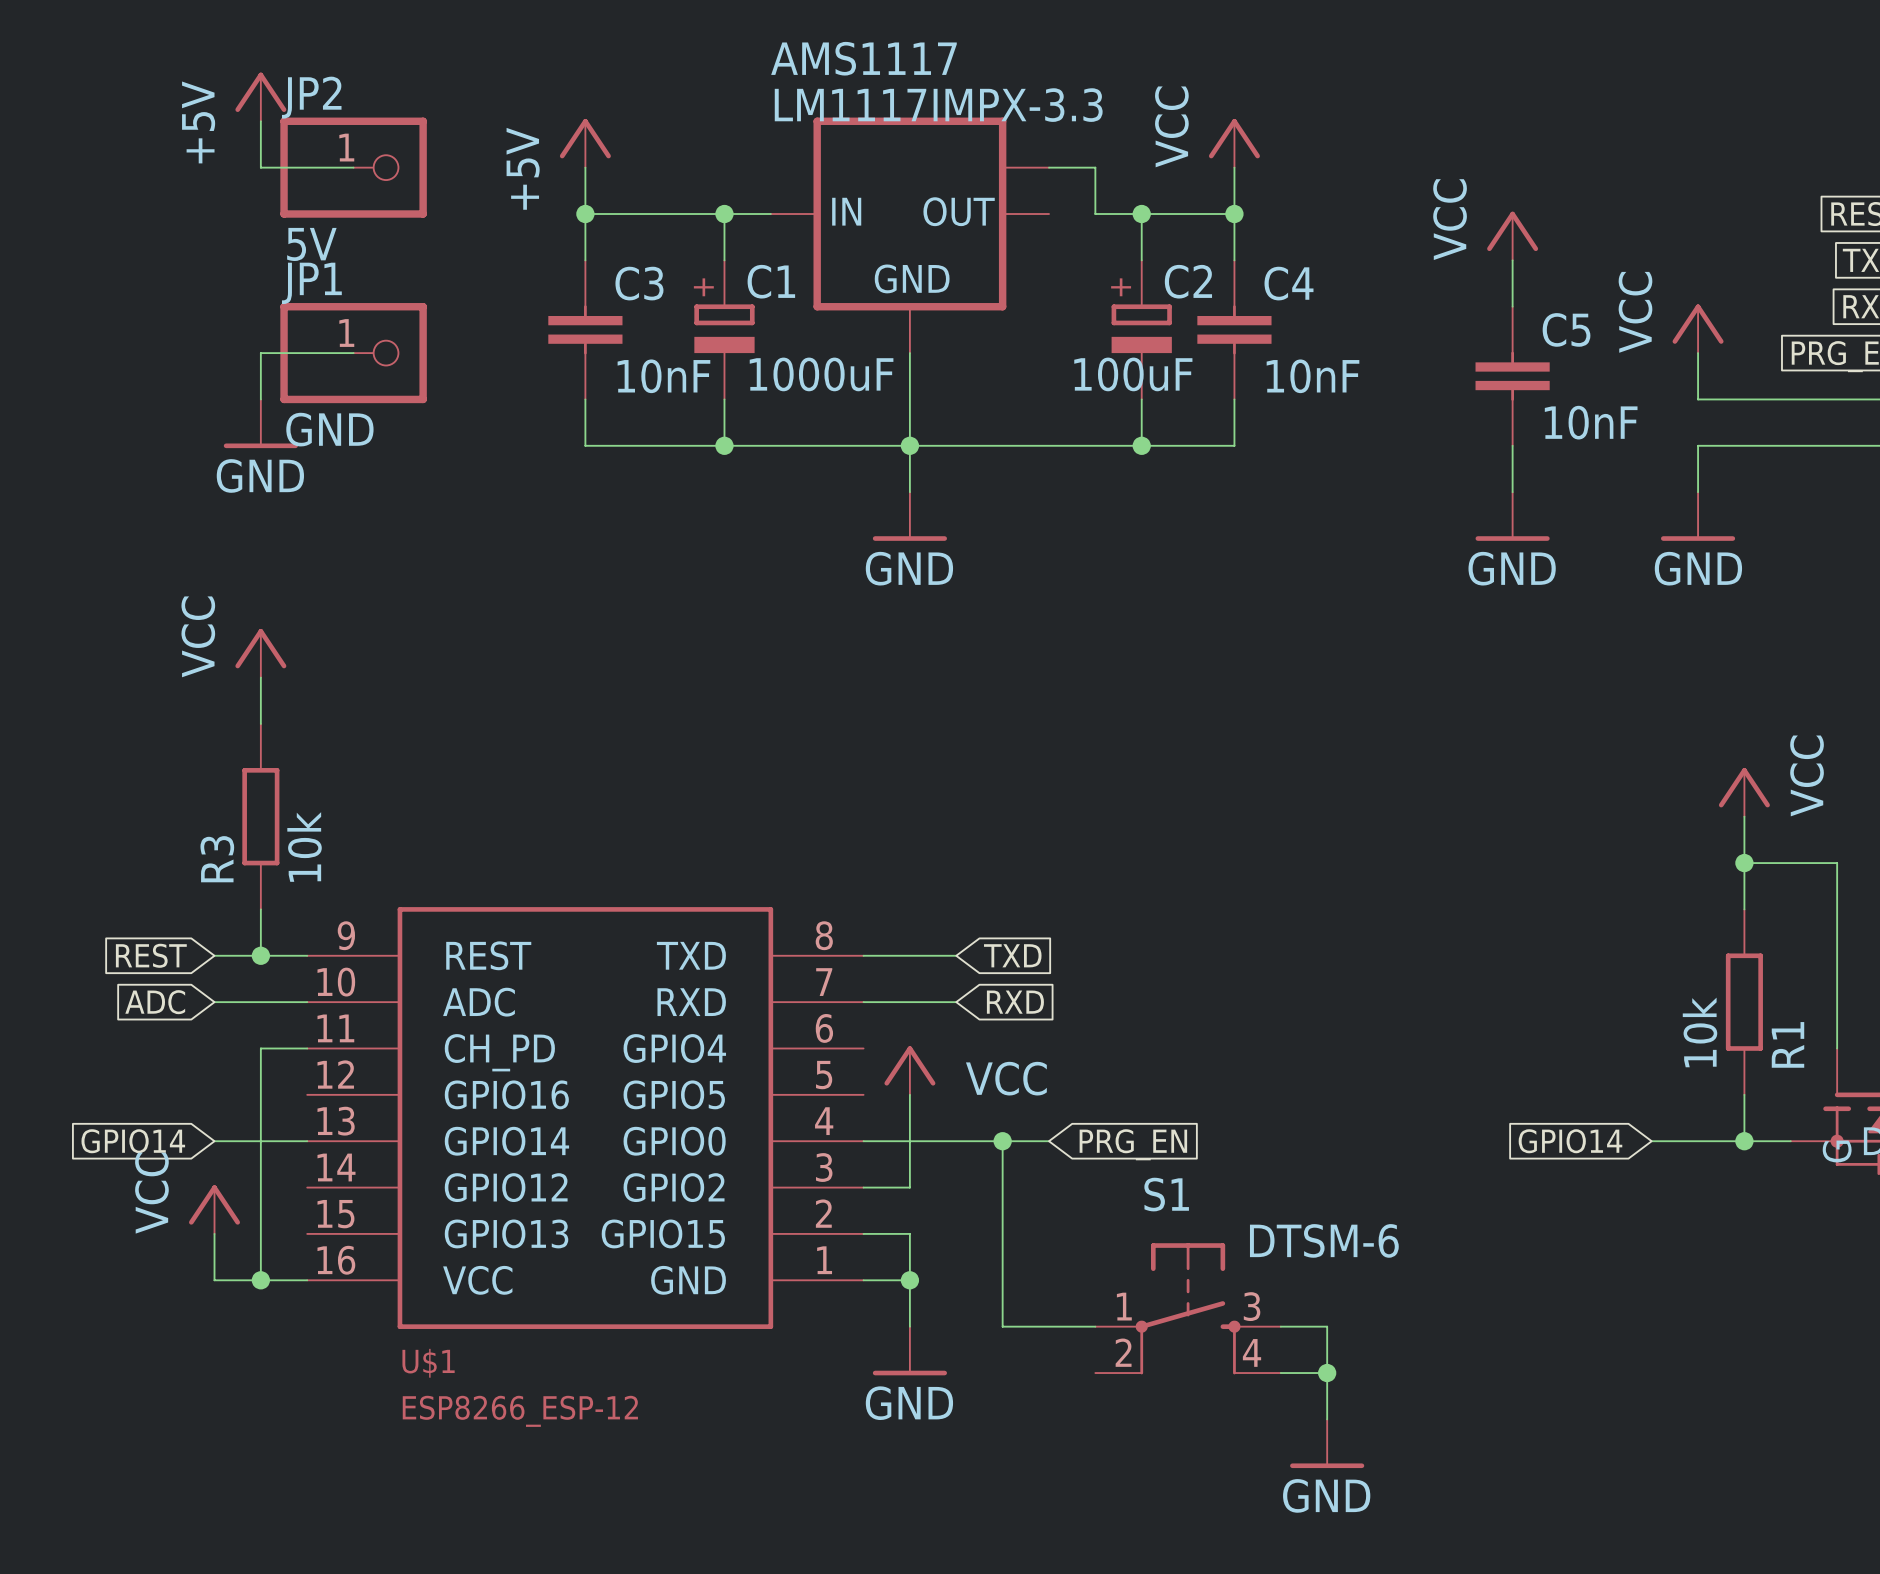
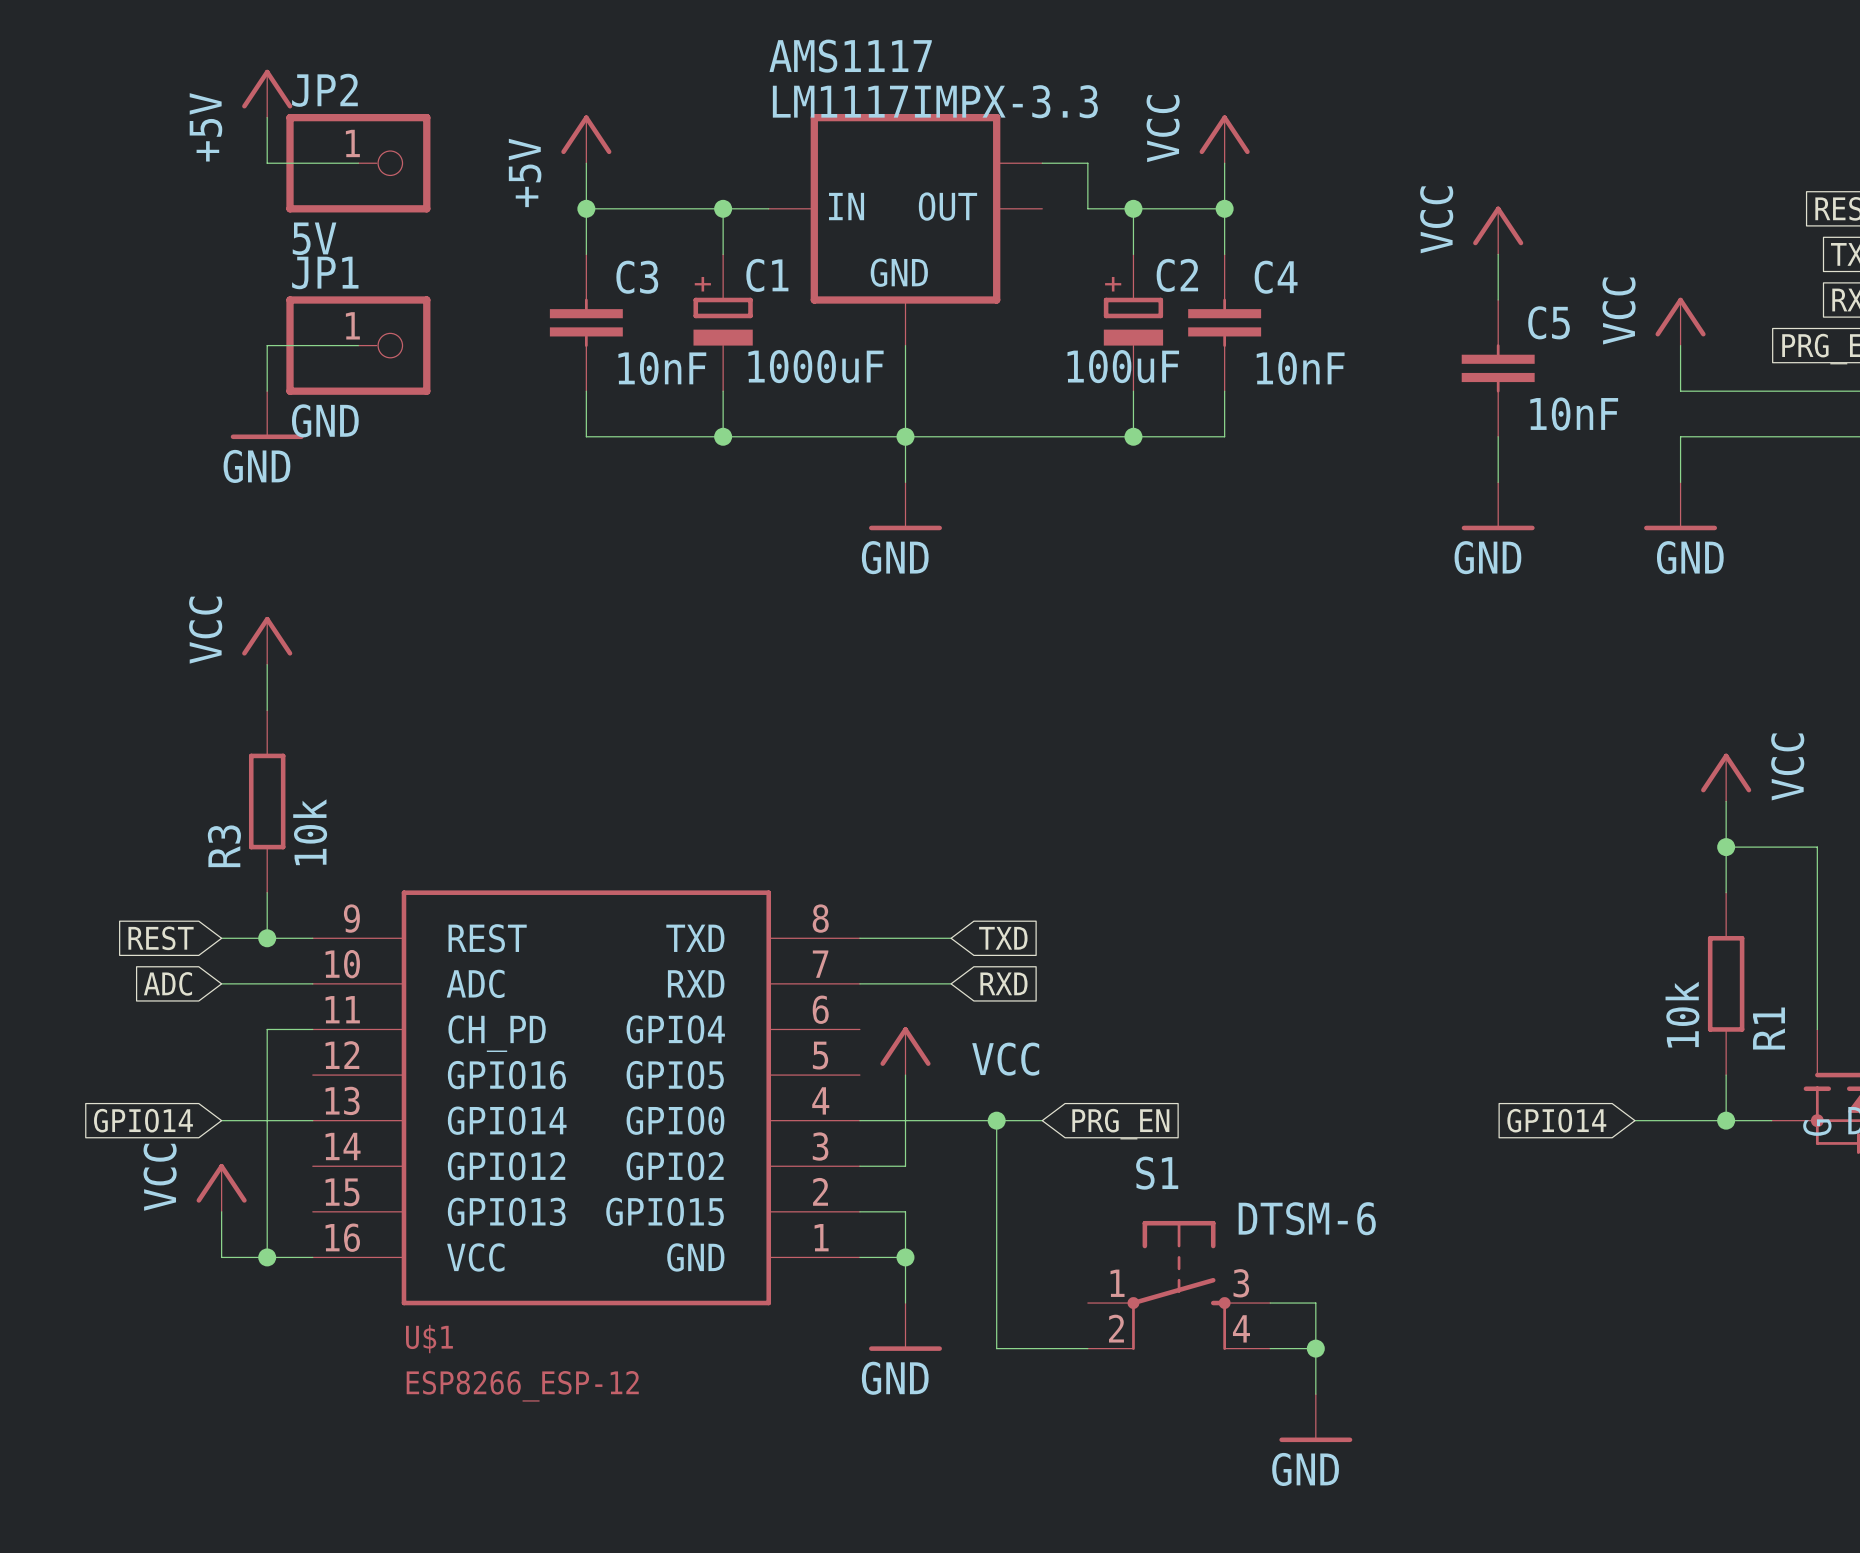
wire: (1002, 1326) (1095, 1326) -> (996, 1303) (996, 1348) (1087, 1348)

